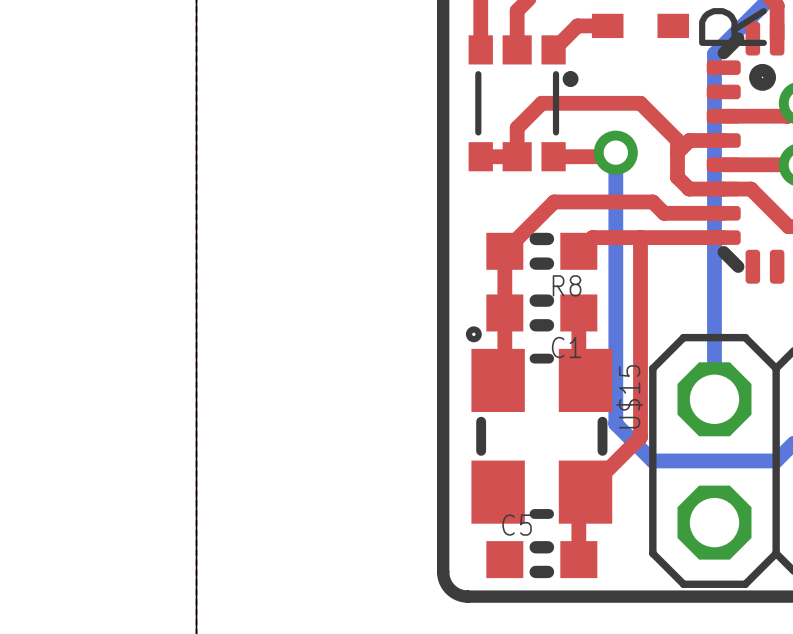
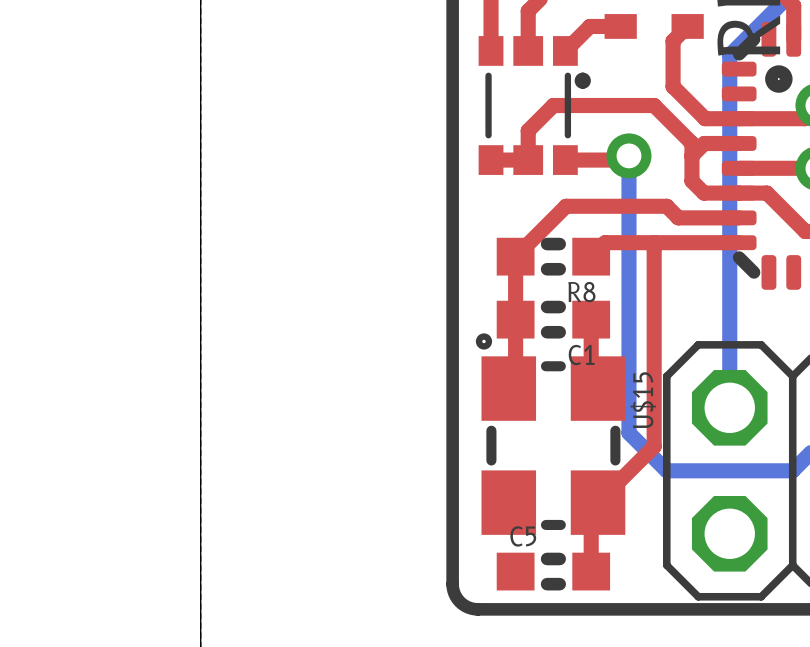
top track: none -> (687, 26) (673, 41) (673, 86) (705, 118) (739, 118)

